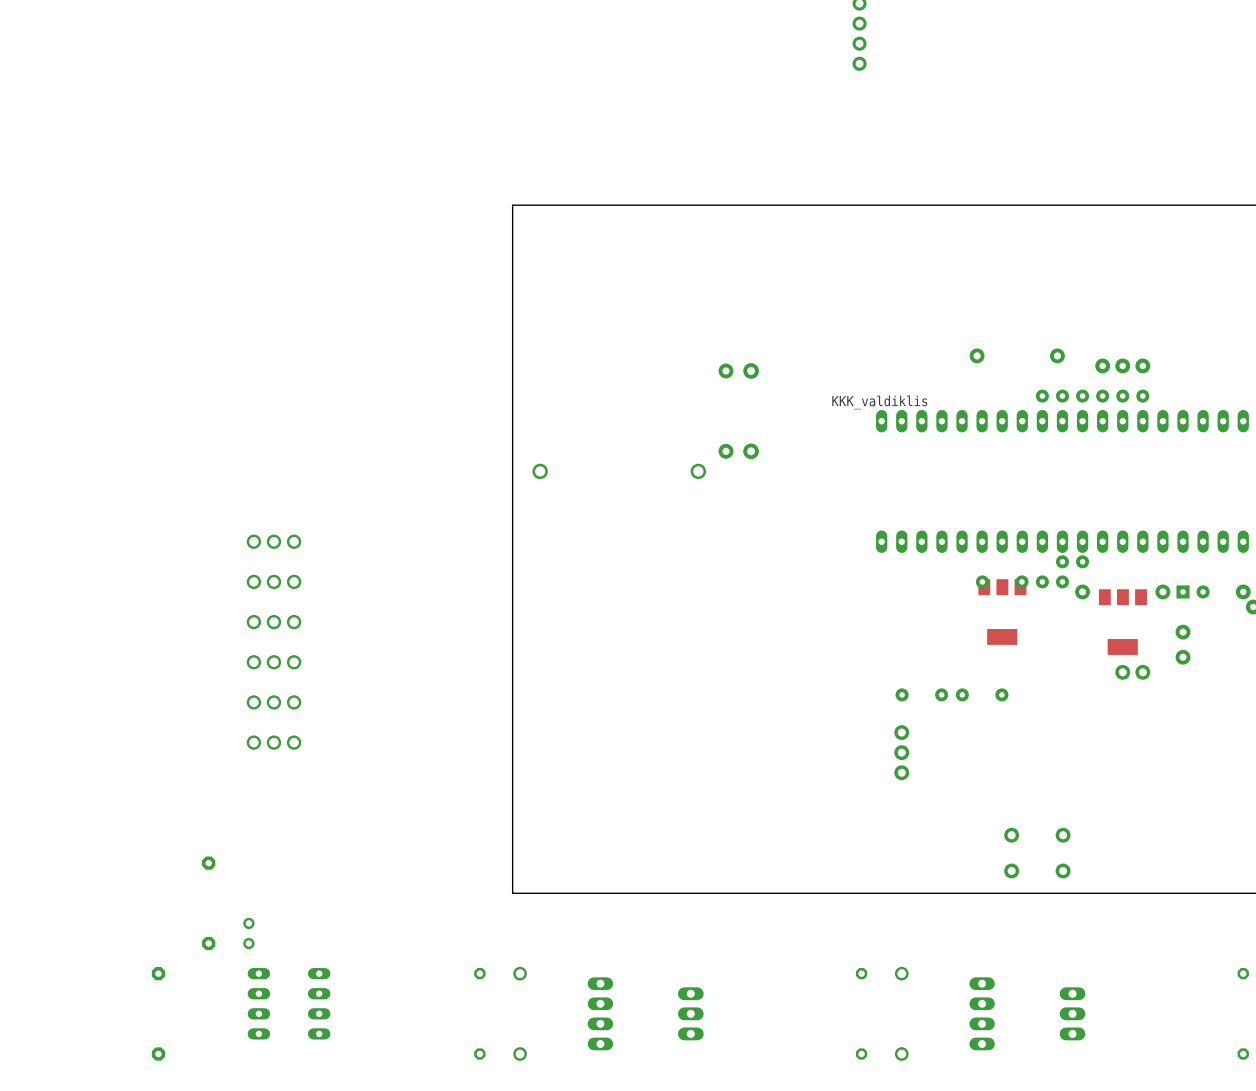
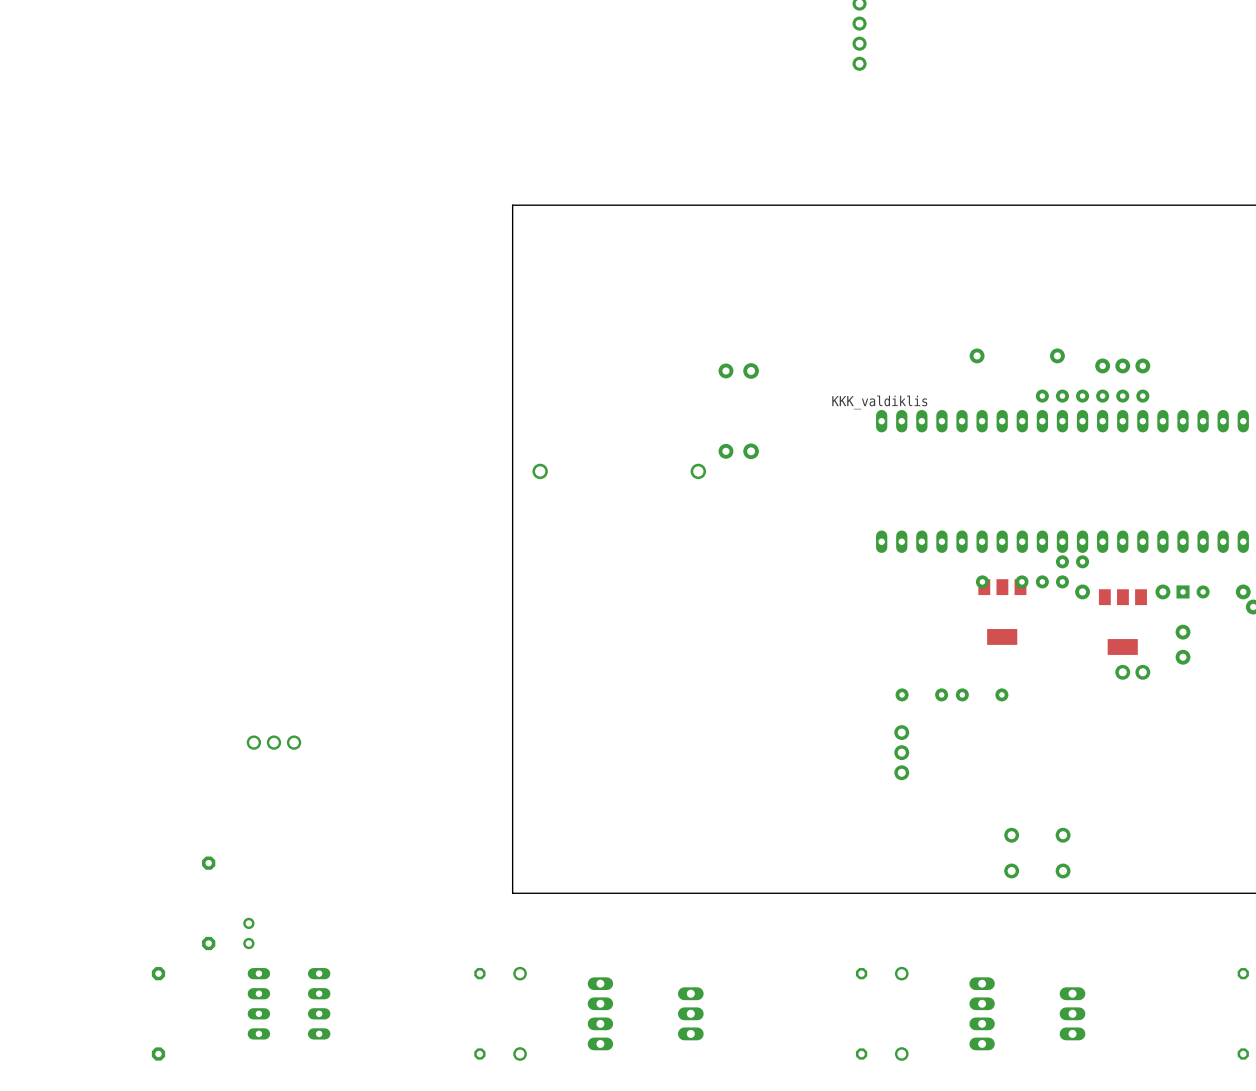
part: (273, 541) -> none
part: (273, 581) -> none
part: (273, 622) -> none
part: (273, 662) -> none
part: (273, 702) -> none

